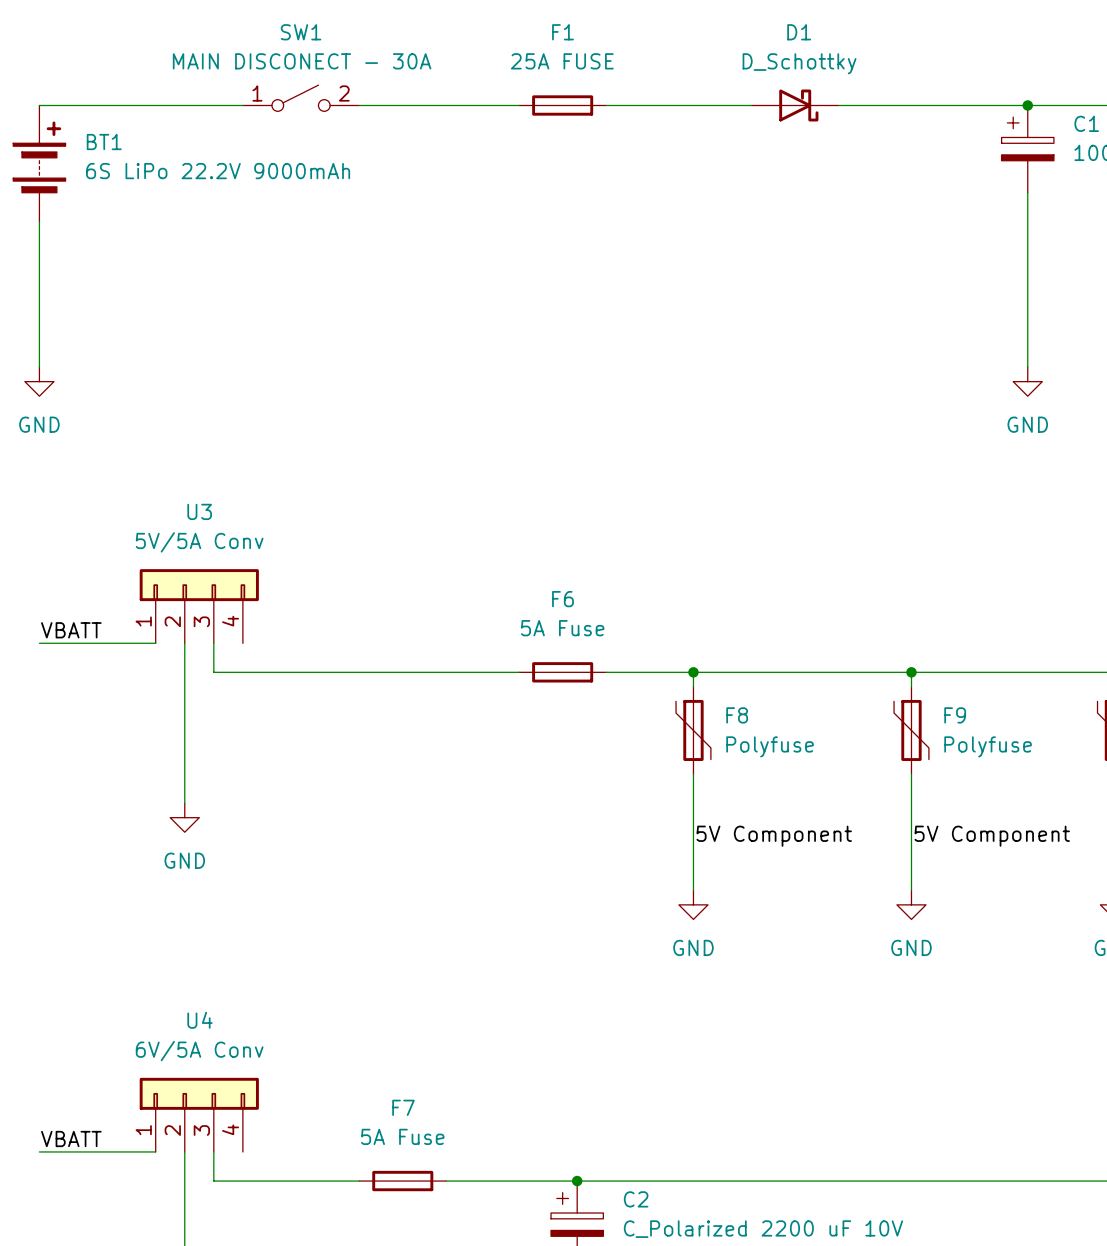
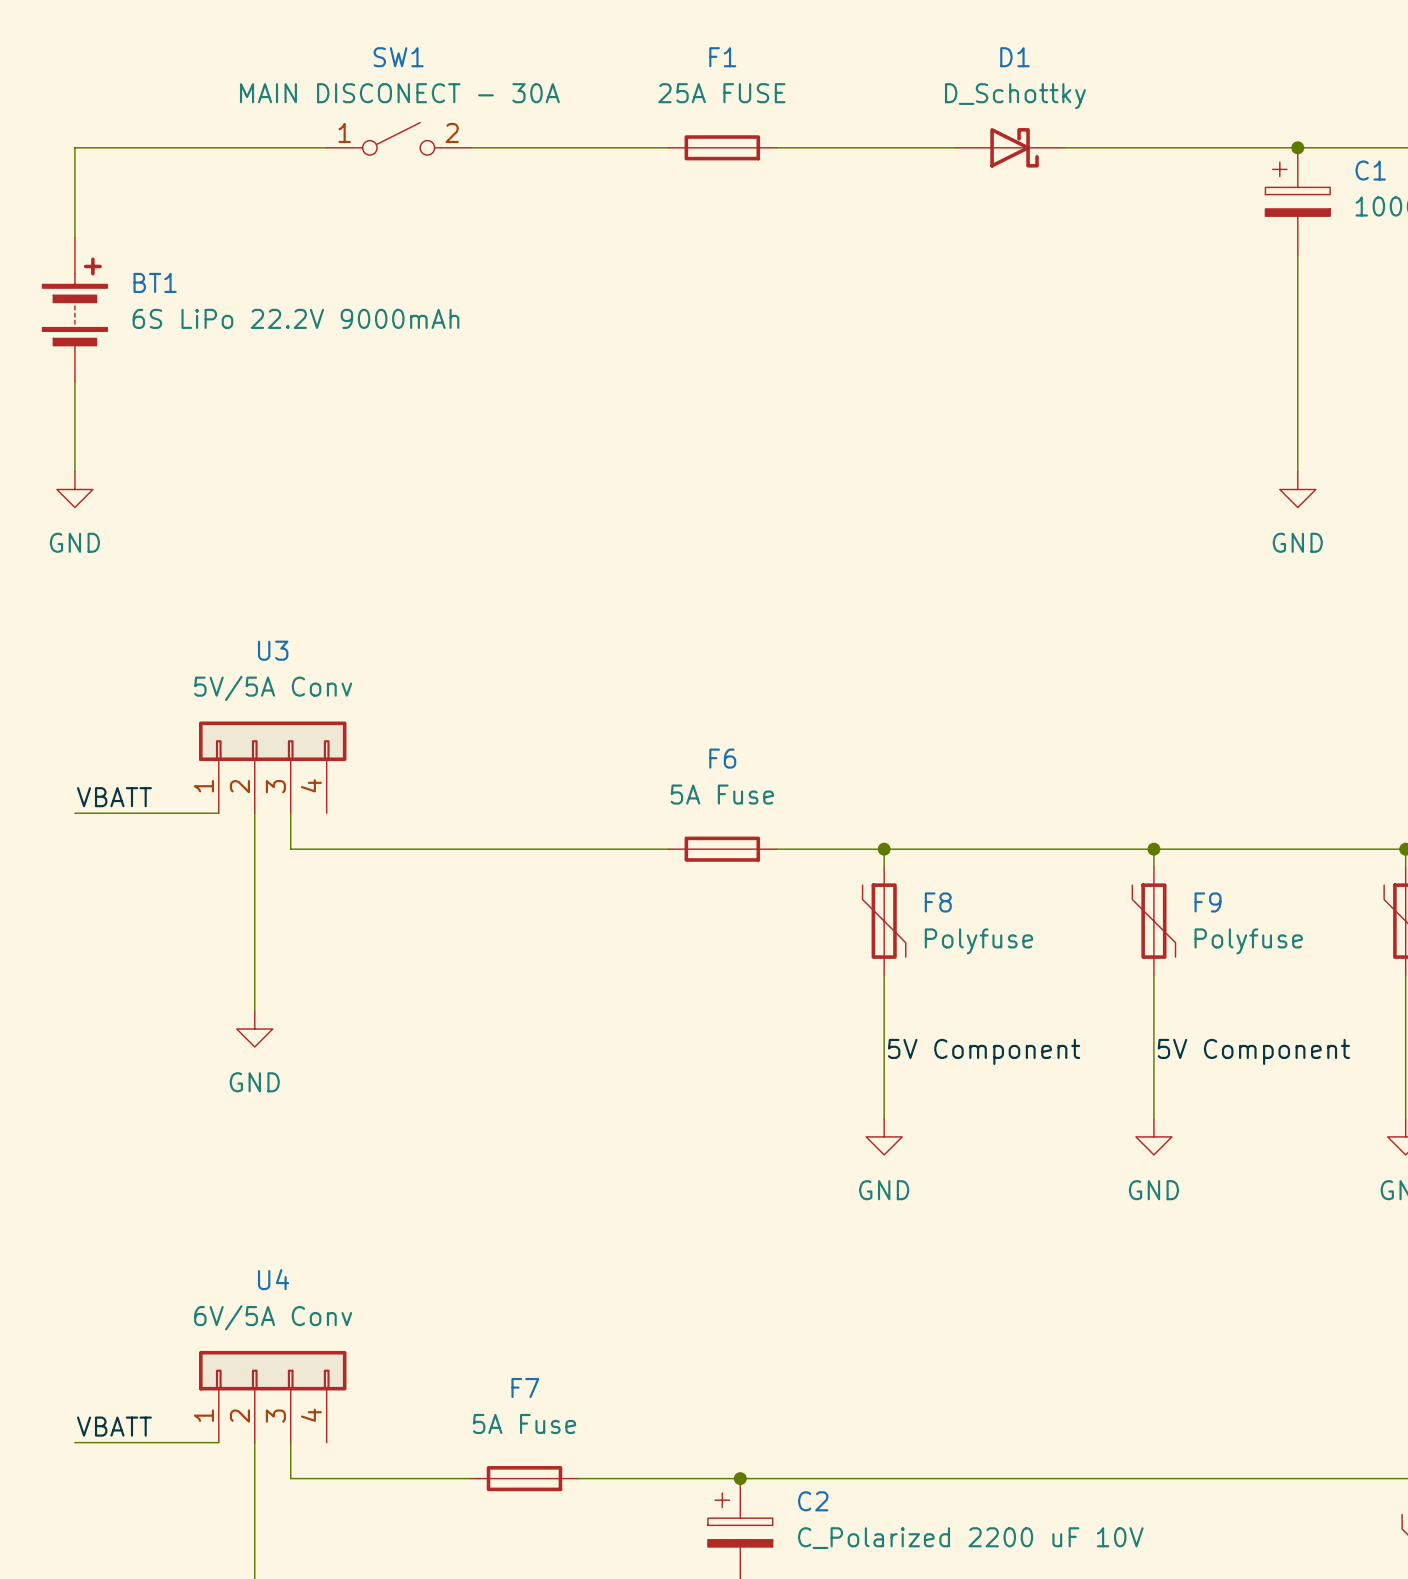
BT1 position: (39, 163) -> (74, 309)

